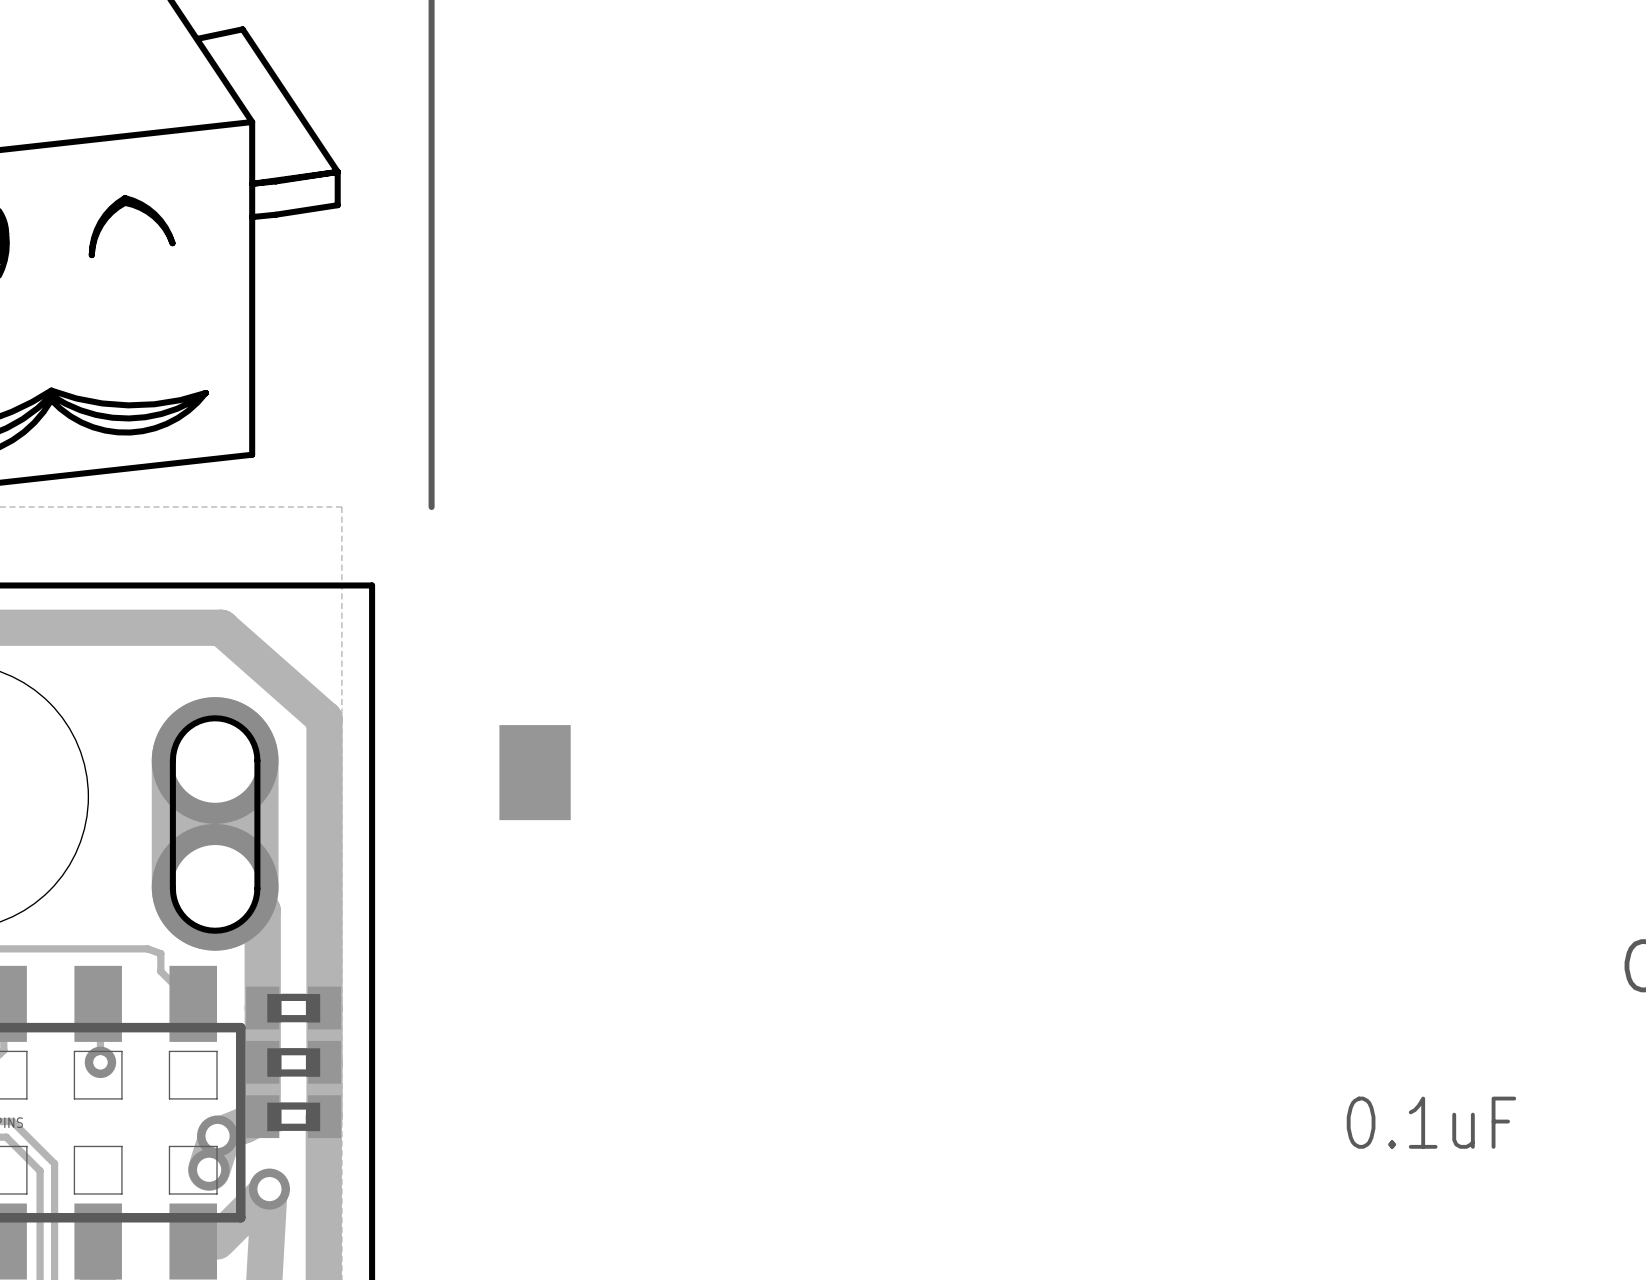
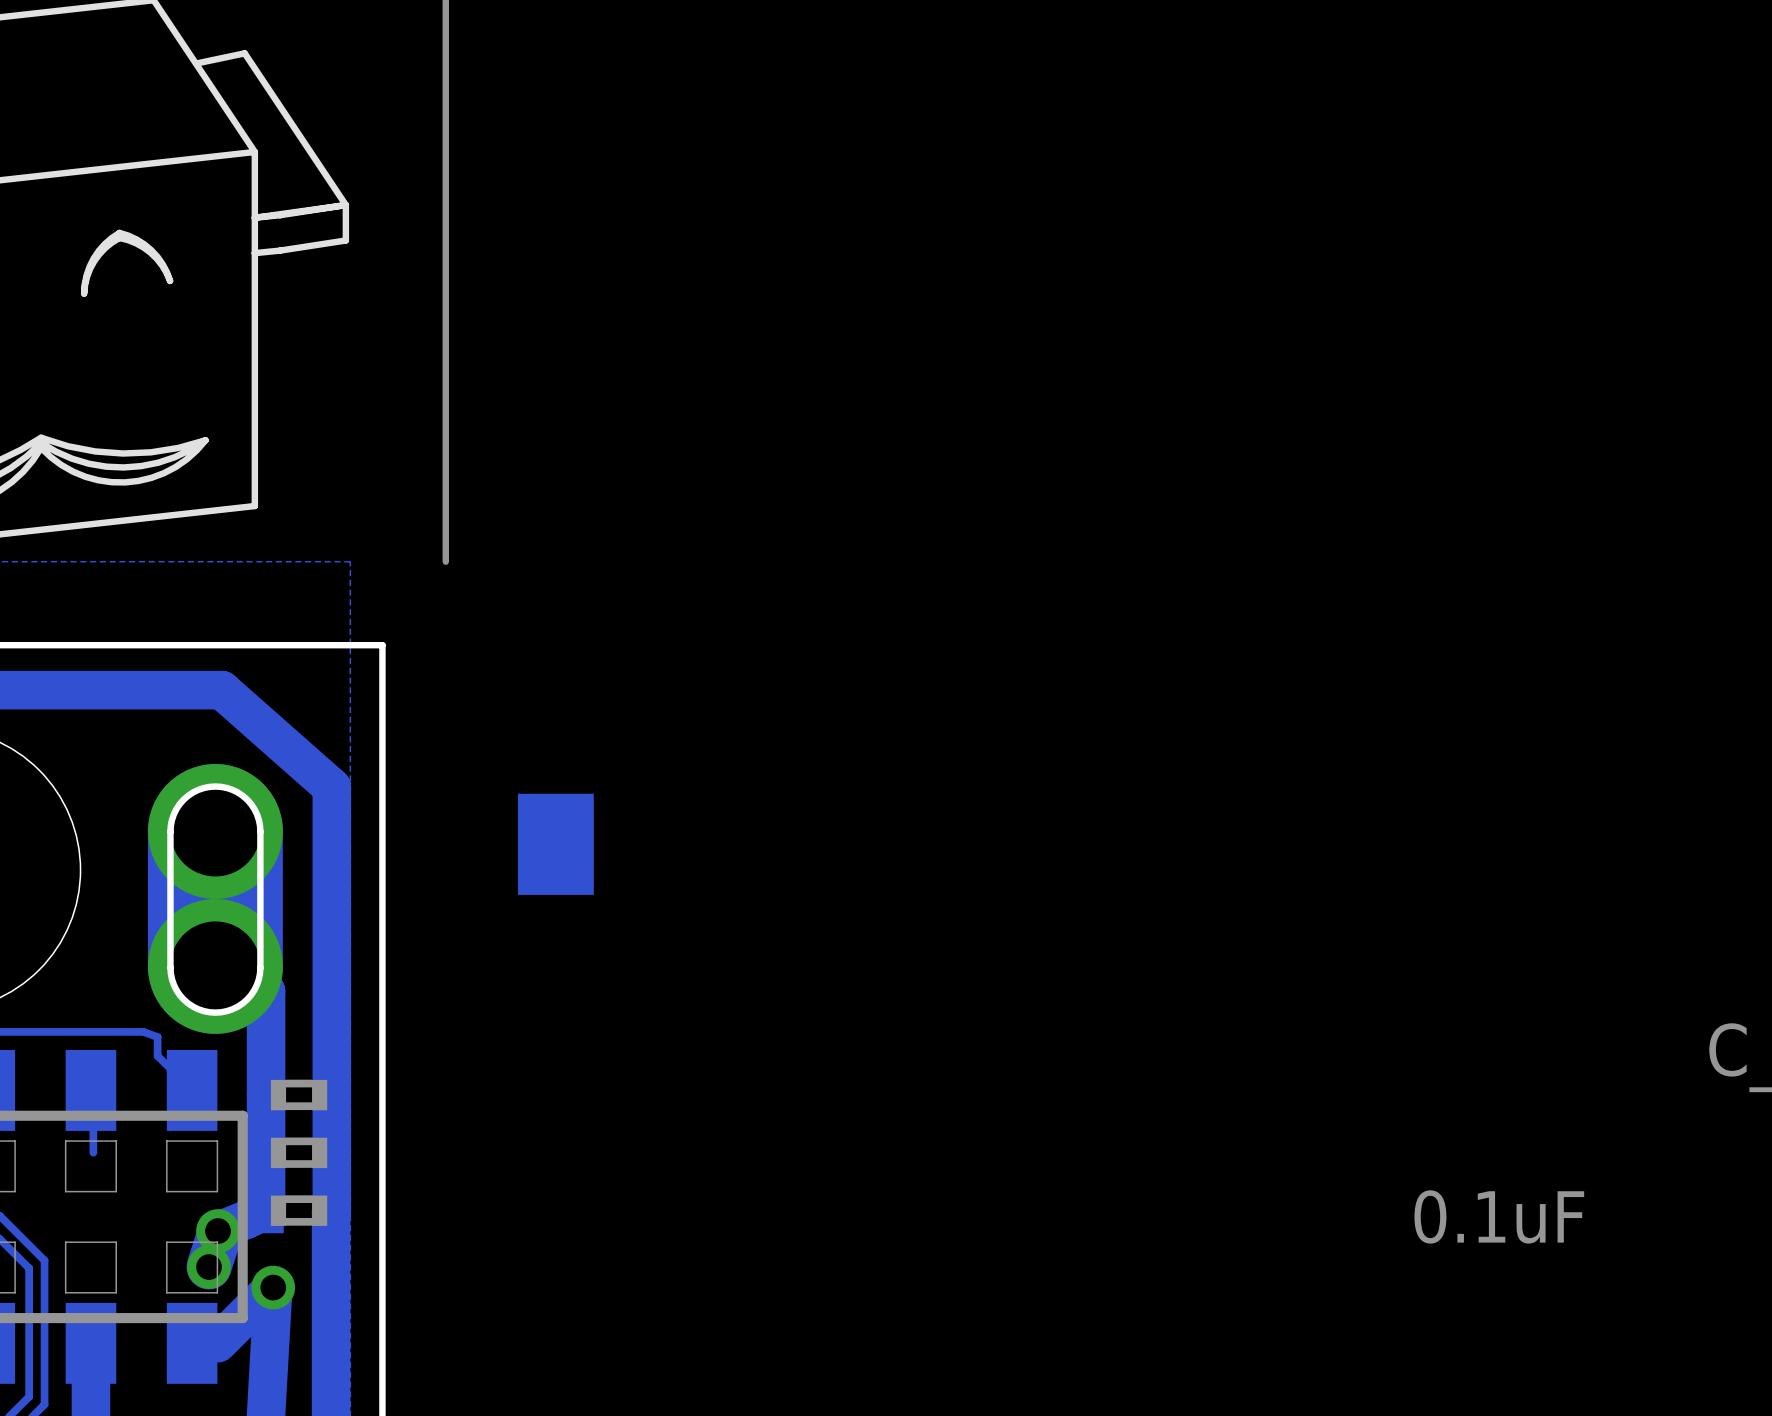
via: (100, 1062) -> none

